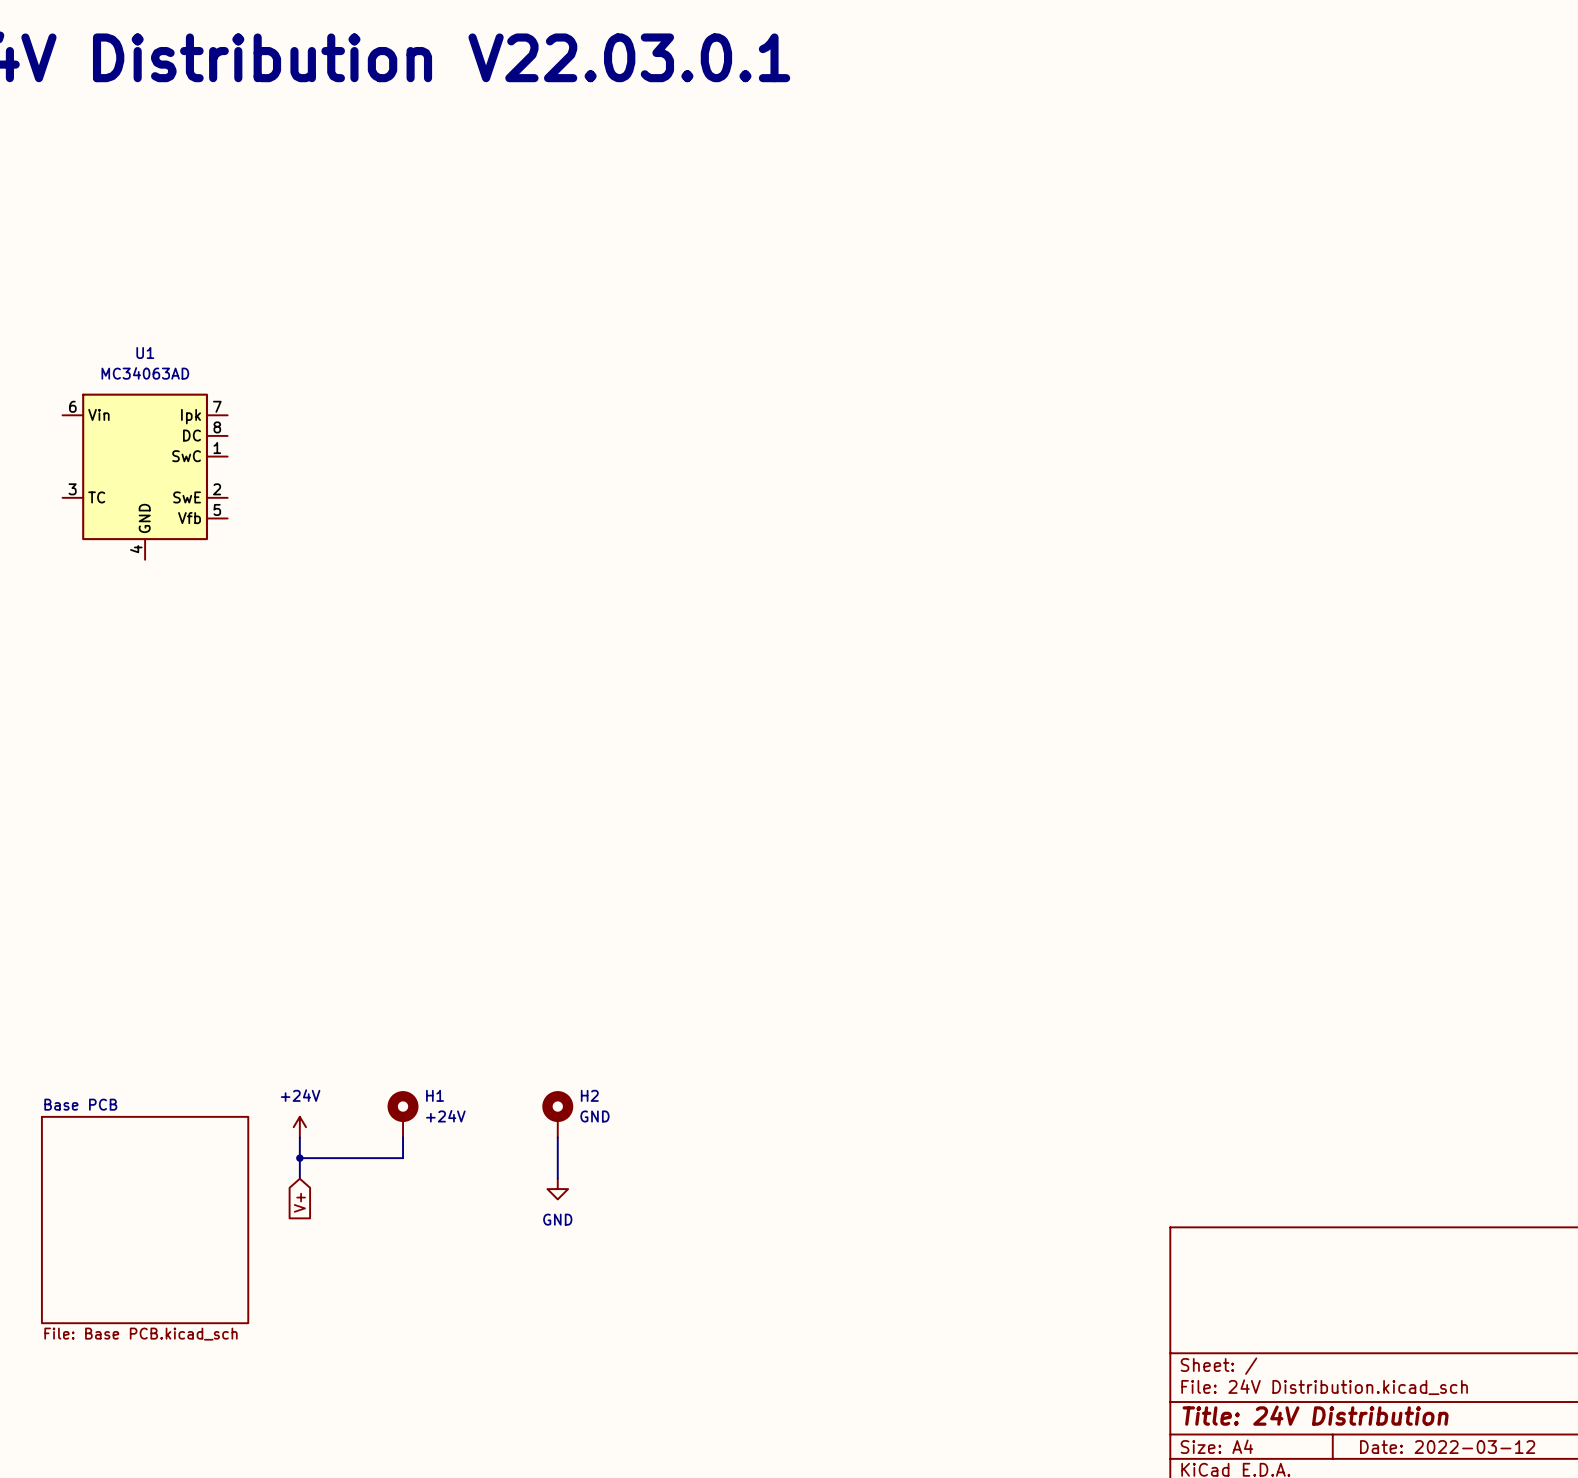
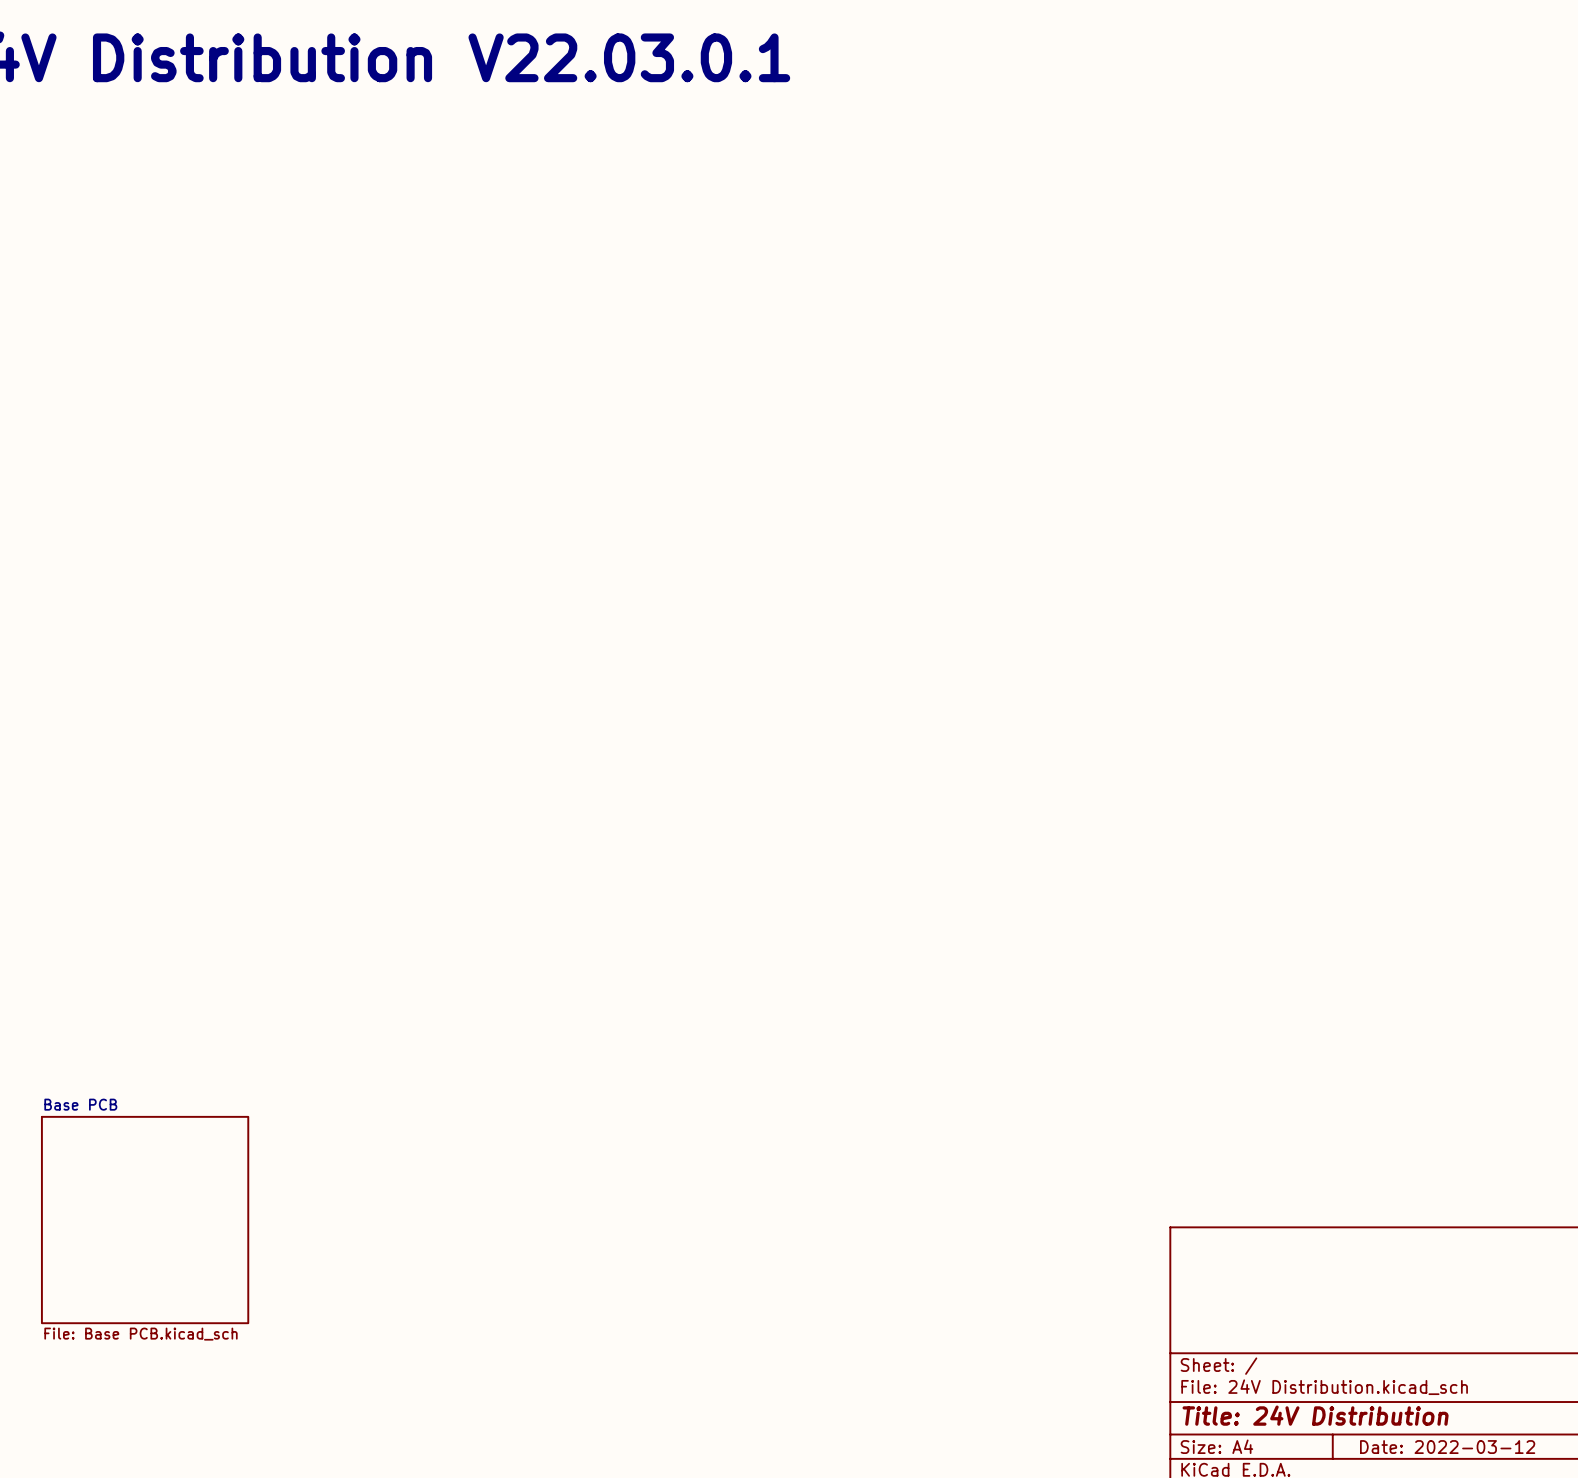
U1: MC34063AD (145, 476) -> none
H1: +24V (403, 1114) -> none
H2: GND (557, 1114) -> none
power symbol: +24V (299, 1127) -> none
wire: (299, 1137) (299, 1178) -> none
wire: (403, 1137) (403, 1158) (299, 1158) -> none
wire: (557, 1137) (557, 1178) -> none
junction: (299, 1158) -> none
power symbol: GND (557, 1189) -> none
global label: V+ (299, 1202) -> none

